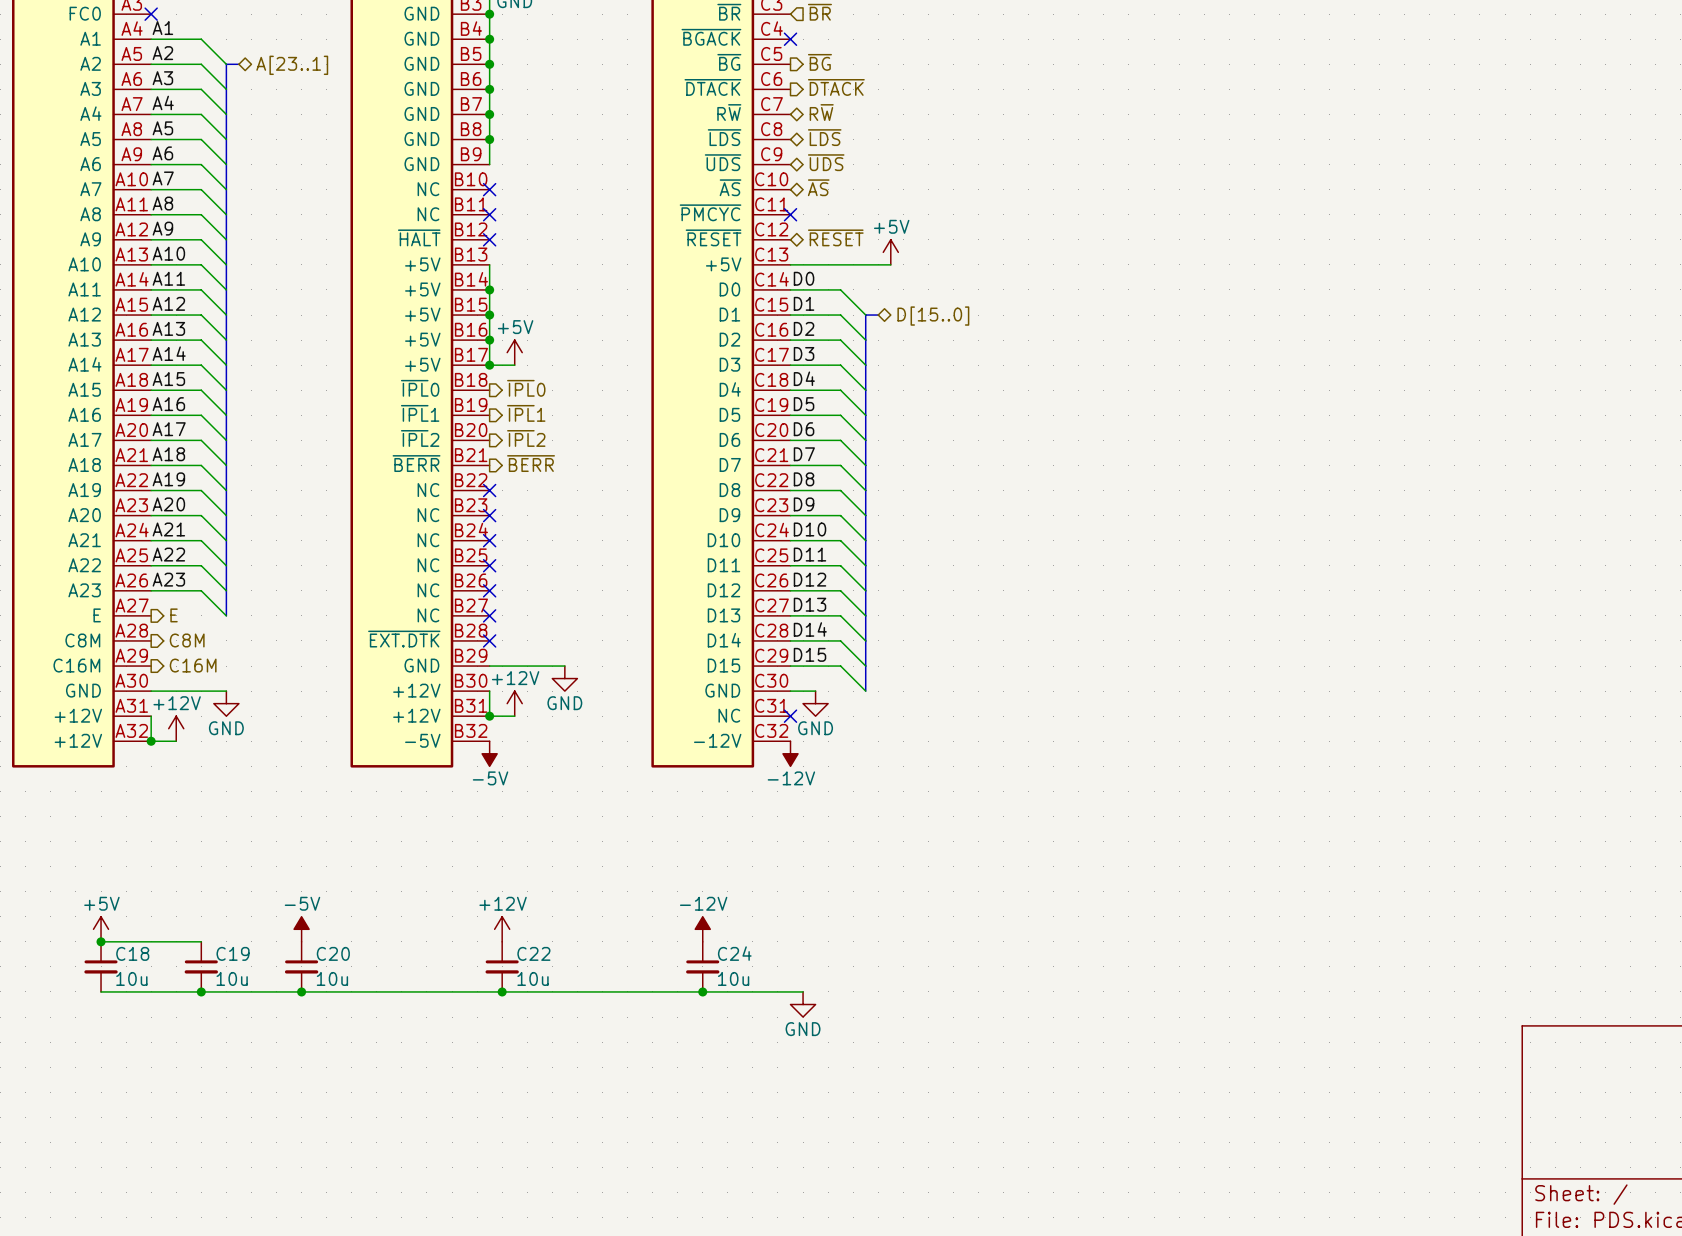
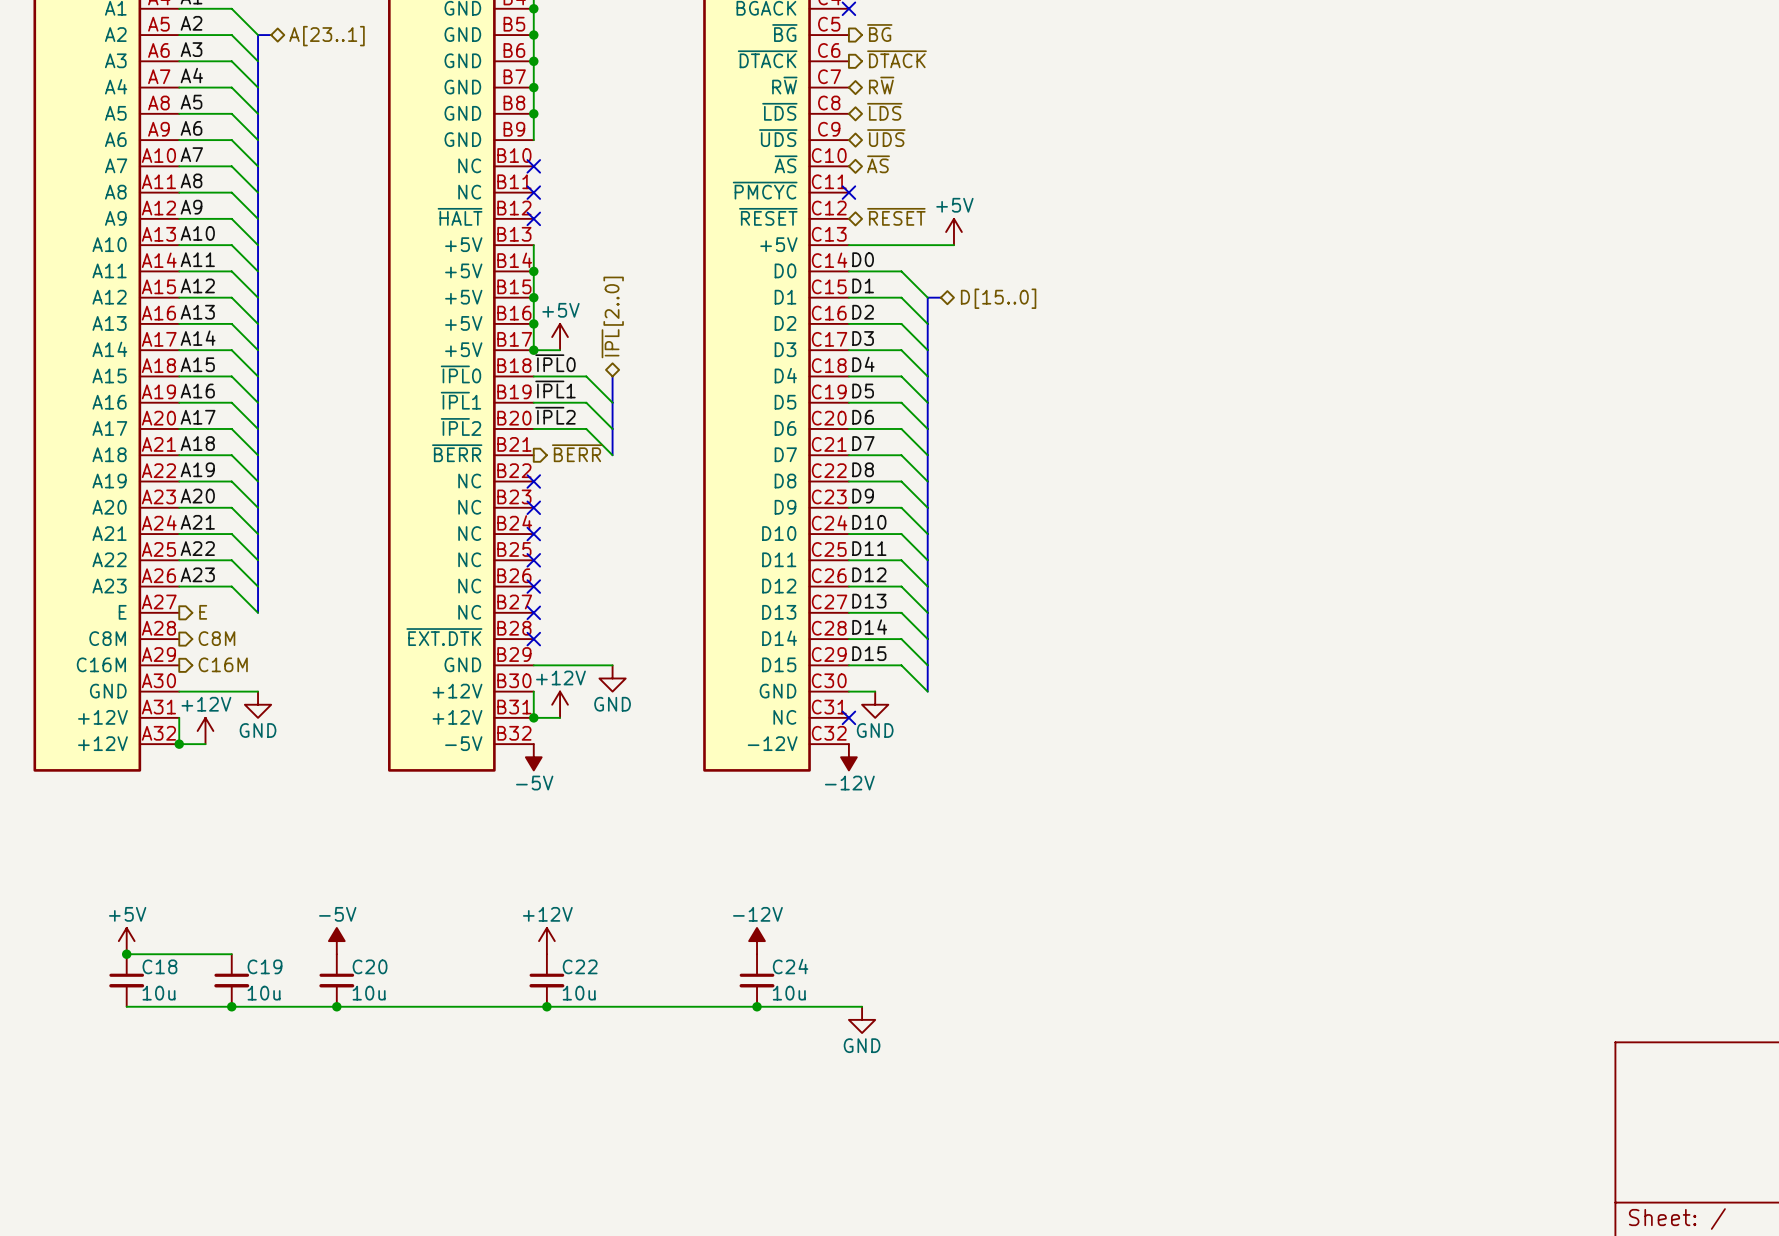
hierarchical label: none -> ~{IPL}[2..0] (612, 317)
label: none -> ~{IPL}0 (555, 363)
hierarchical label: ~{IPL}0 (526, 388) -> none
wire: none -> (533, 376) (586, 376) (612, 402)
bus: none -> (612, 376) (612, 455)
label: none -> ~{IPL}1 (555, 389)
hierarchical label: ~{IPL}1 (526, 413) -> none
wire: none -> (533, 402) (586, 402) (612, 428)
label: none -> ~{IPL}2 (555, 415)
hierarchical label: ~{IPL}2 (526, 438) -> none
wire: none -> (533, 428) (586, 428) (612, 455)

